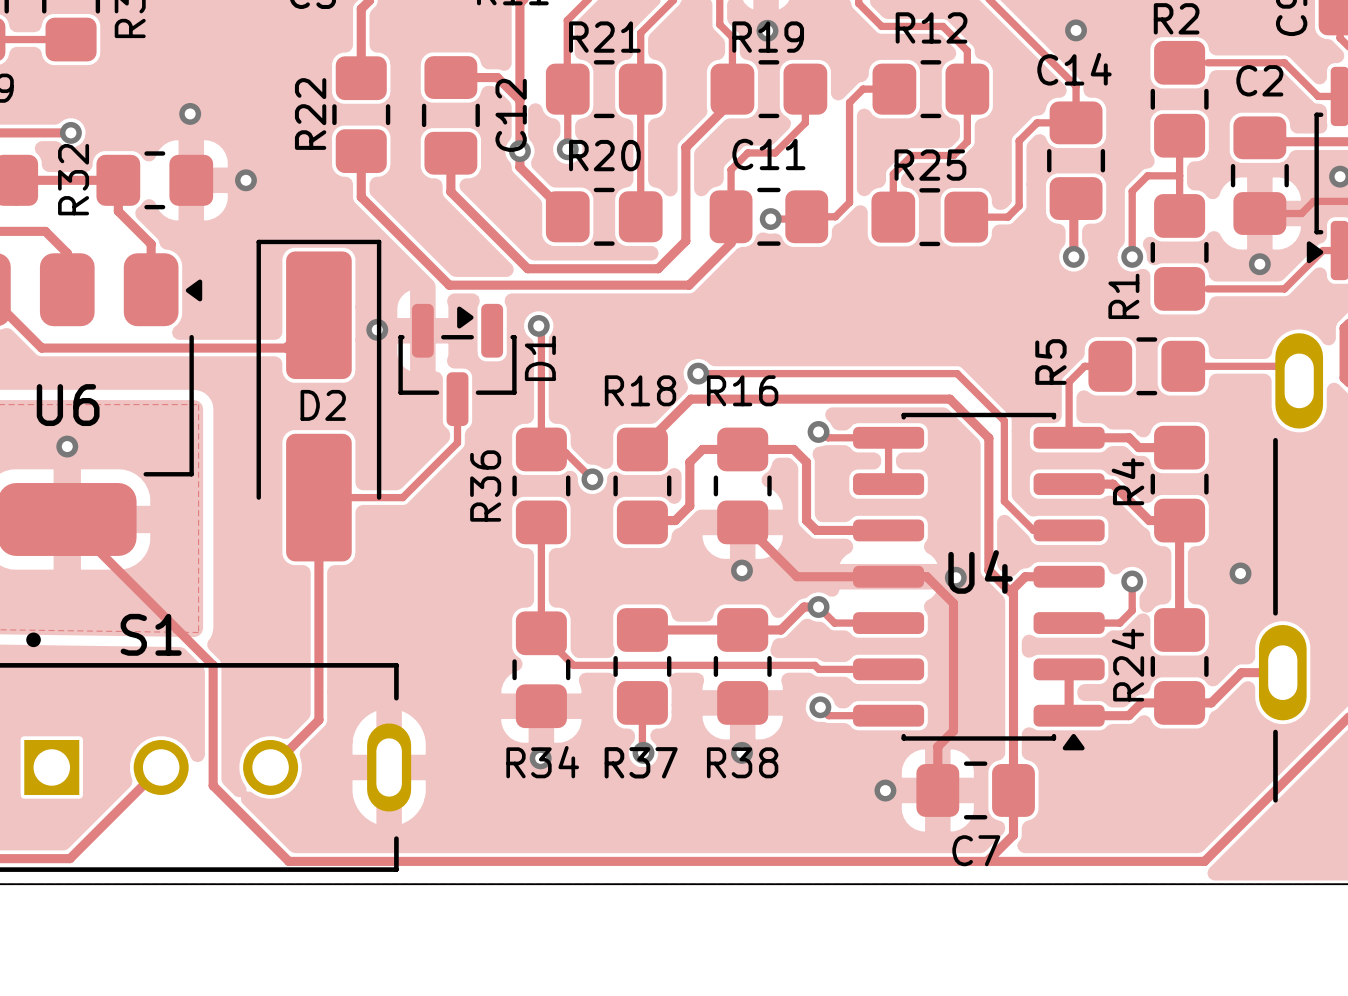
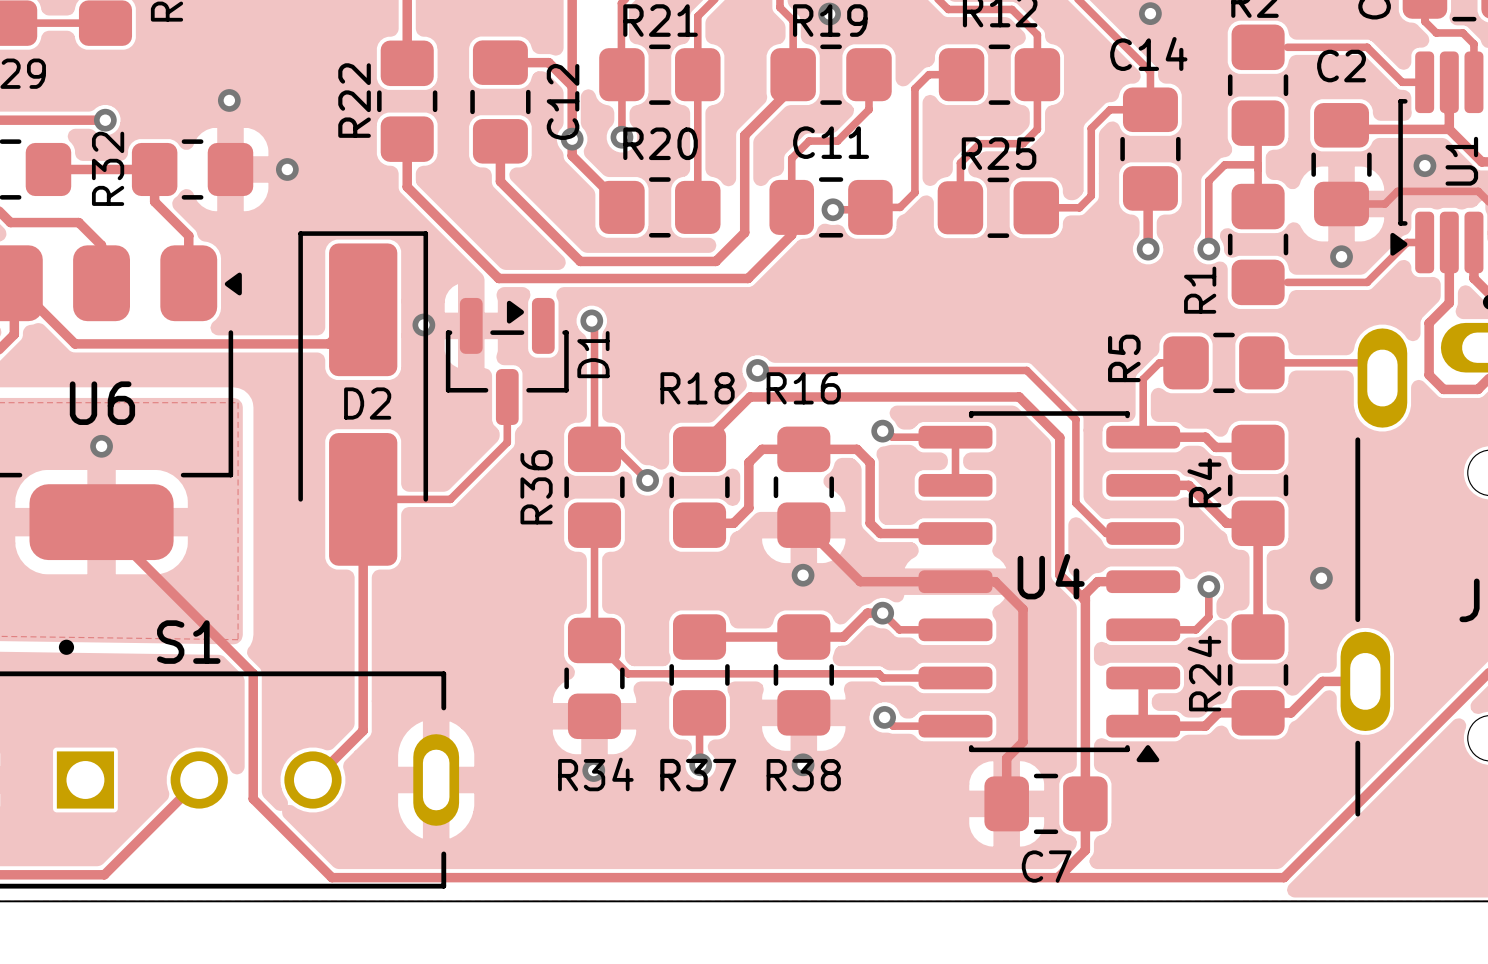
via: (955, 577) -> none
via: (885, 790) -> none

